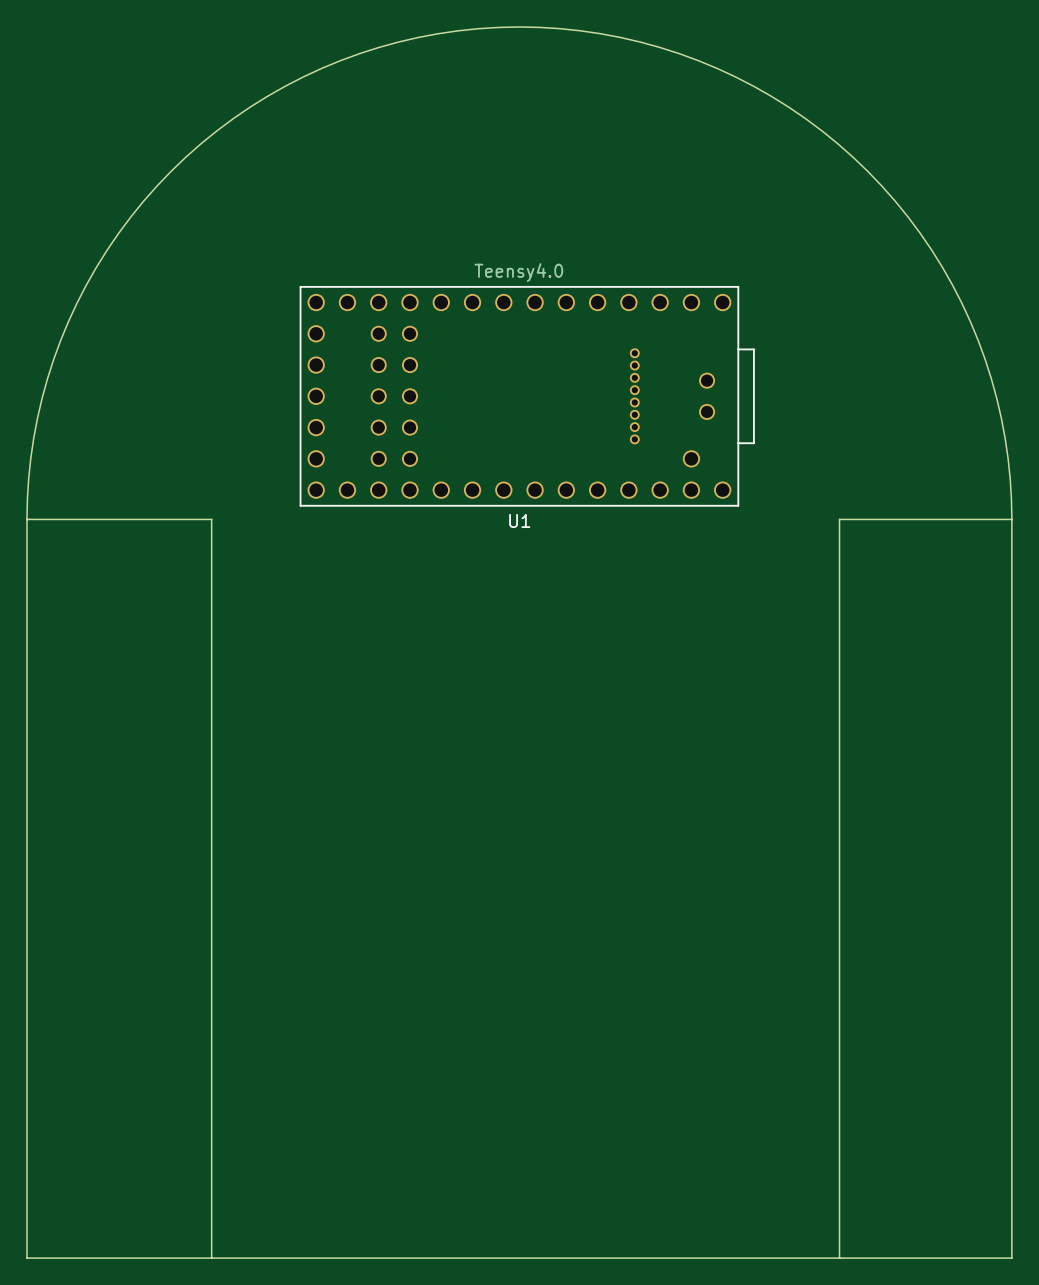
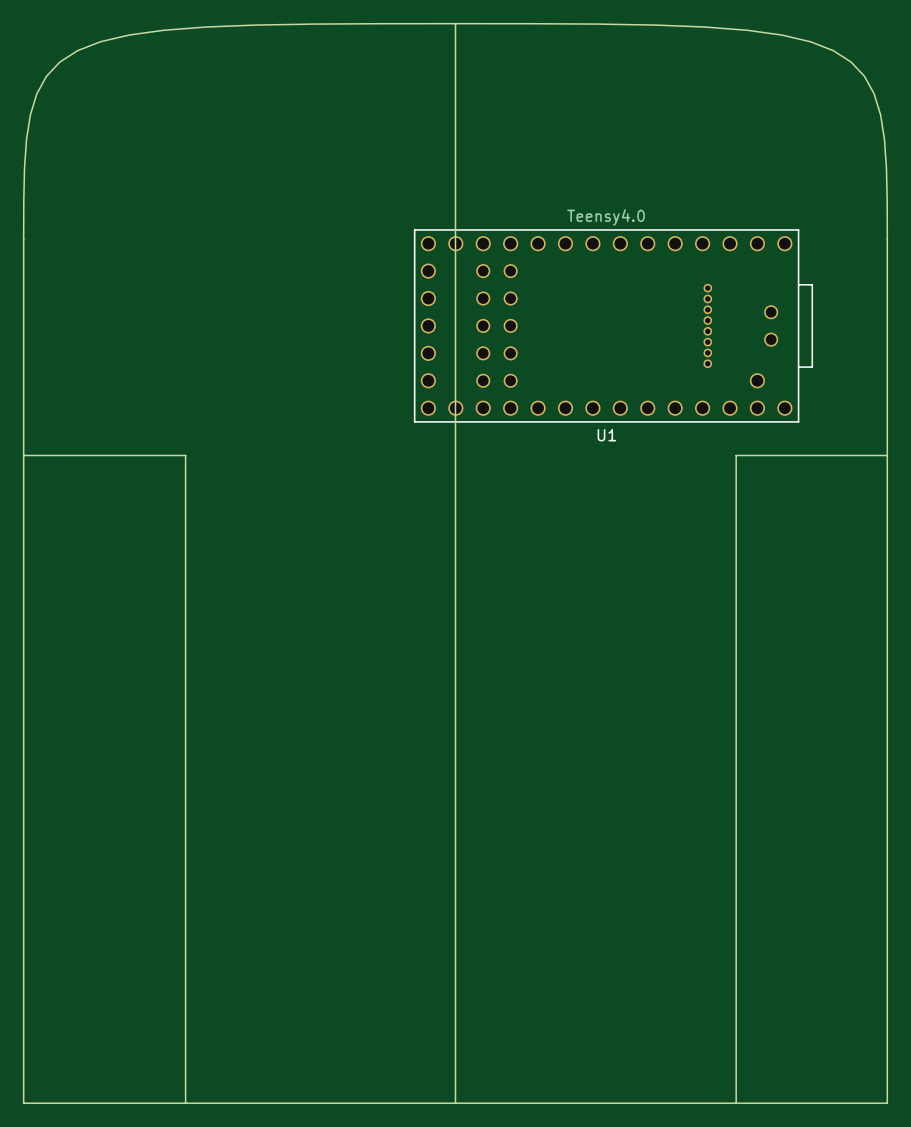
board edge: none -> (455, 23) (455, 1103)
board edge: none -> (455, 23) (255, 25) (163, 30) (100, 41) (77, 50) (59, 62) (46, 76) (36, 93) (30, 114) (26, 139) (23, 201) (23, 455)
U1 position: (527, 396) -> (613, 325)
board edge: (26, 519) (28, 478) (37, 418) (47, 378) (60, 340) (86, 285) (107, 250) (143, 201) (171, 171) (201, 143) (233, 118) (267, 96) (321, 68) (359, 53) (418, 37) (478, 28) (519, 26) (560, 28) (600, 33) (659, 47) (698, 60) (753, 86) (788, 107) (837, 143) (867, 171) (895, 201) (931, 250) (952, 285) (970, 321) (991, 378) (1001, 418) (1008, 458) (1011, 519) -> (455, 23) (655, 25) (746, 30) (810, 41) (833, 50) (851, 62) (864, 76) (874, 93) (880, 114) (884, 139) (887, 201) (887, 455)

